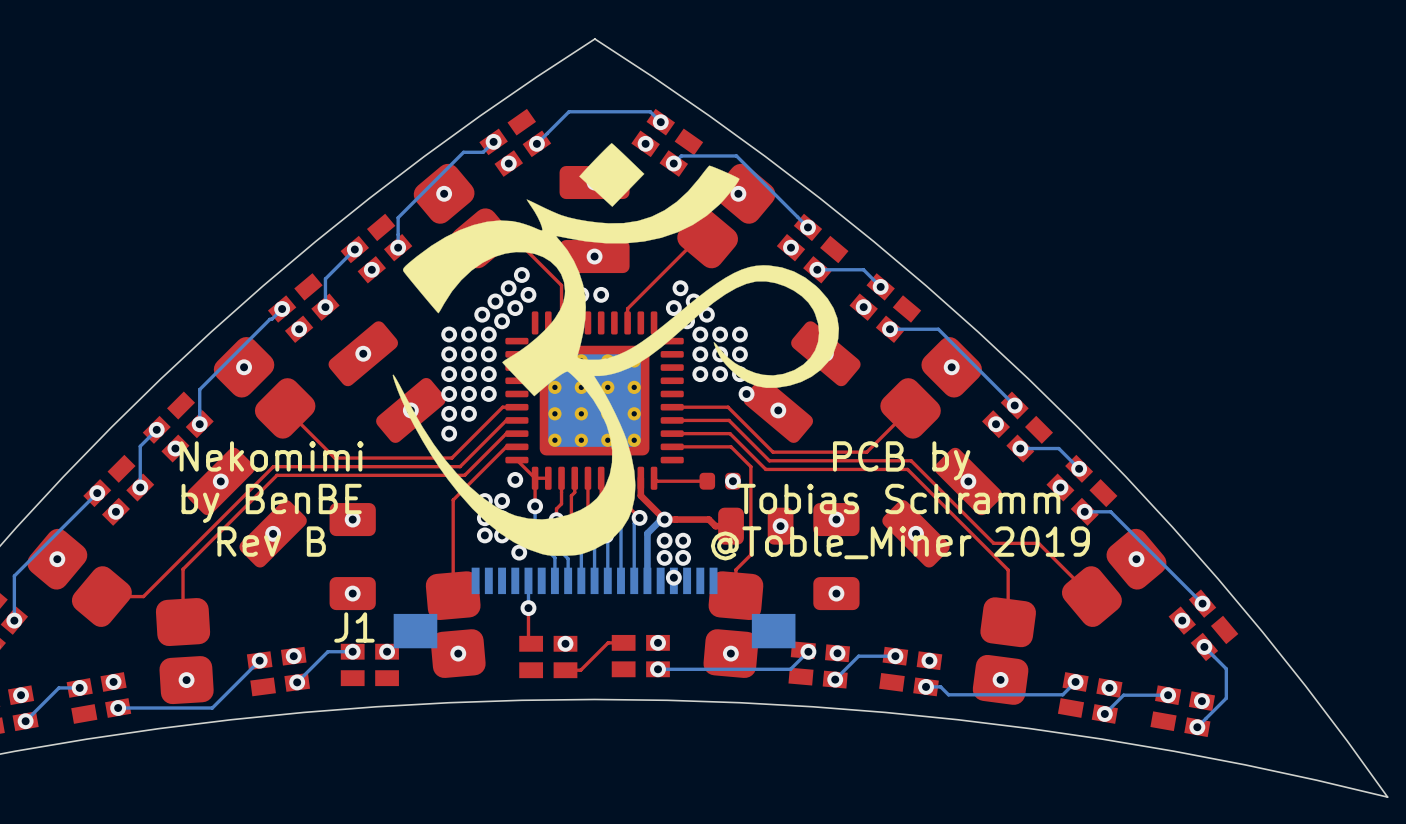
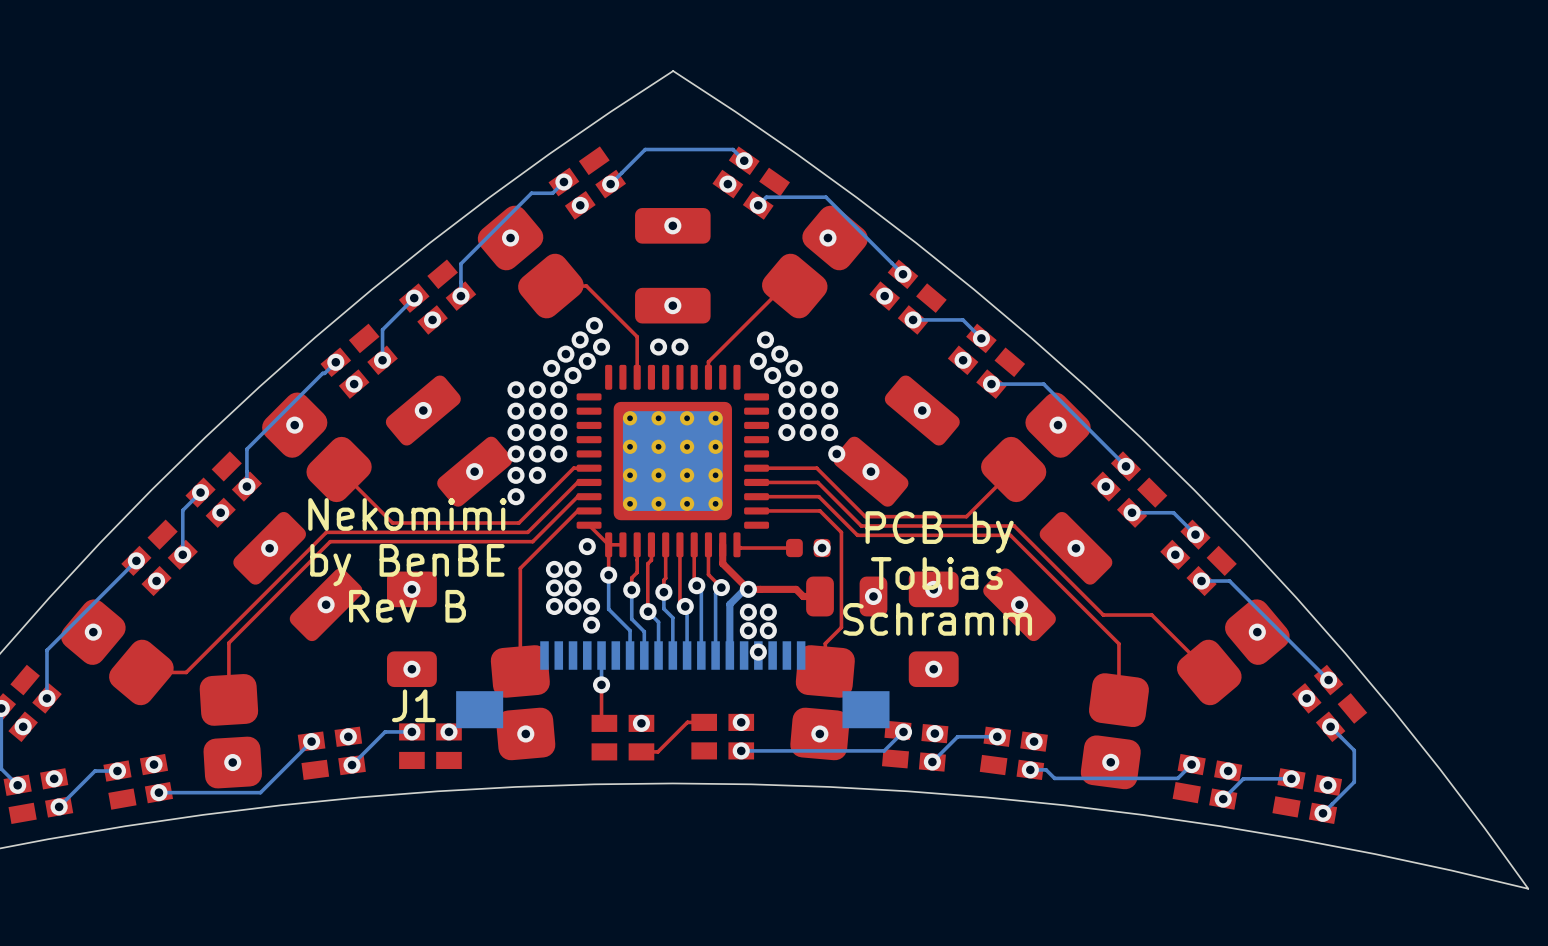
drawing: [392, 143, 840, 556] -> none
text position: Nekomimi (271, 456) -> Nekomimi (407, 514)
text position: PCB by (901, 460) -> PCB by (939, 532)
text: Tobias Schramm (898, 499) -> Schramm (937, 619)
text position: by BenBE (271, 503) -> by BenBE (407, 565)
text: none -> Tobias (936, 573)
text position: Rev B (271, 541) -> Rev B (407, 606)
text: @Toble_Miner 2019 (900, 543) -> none

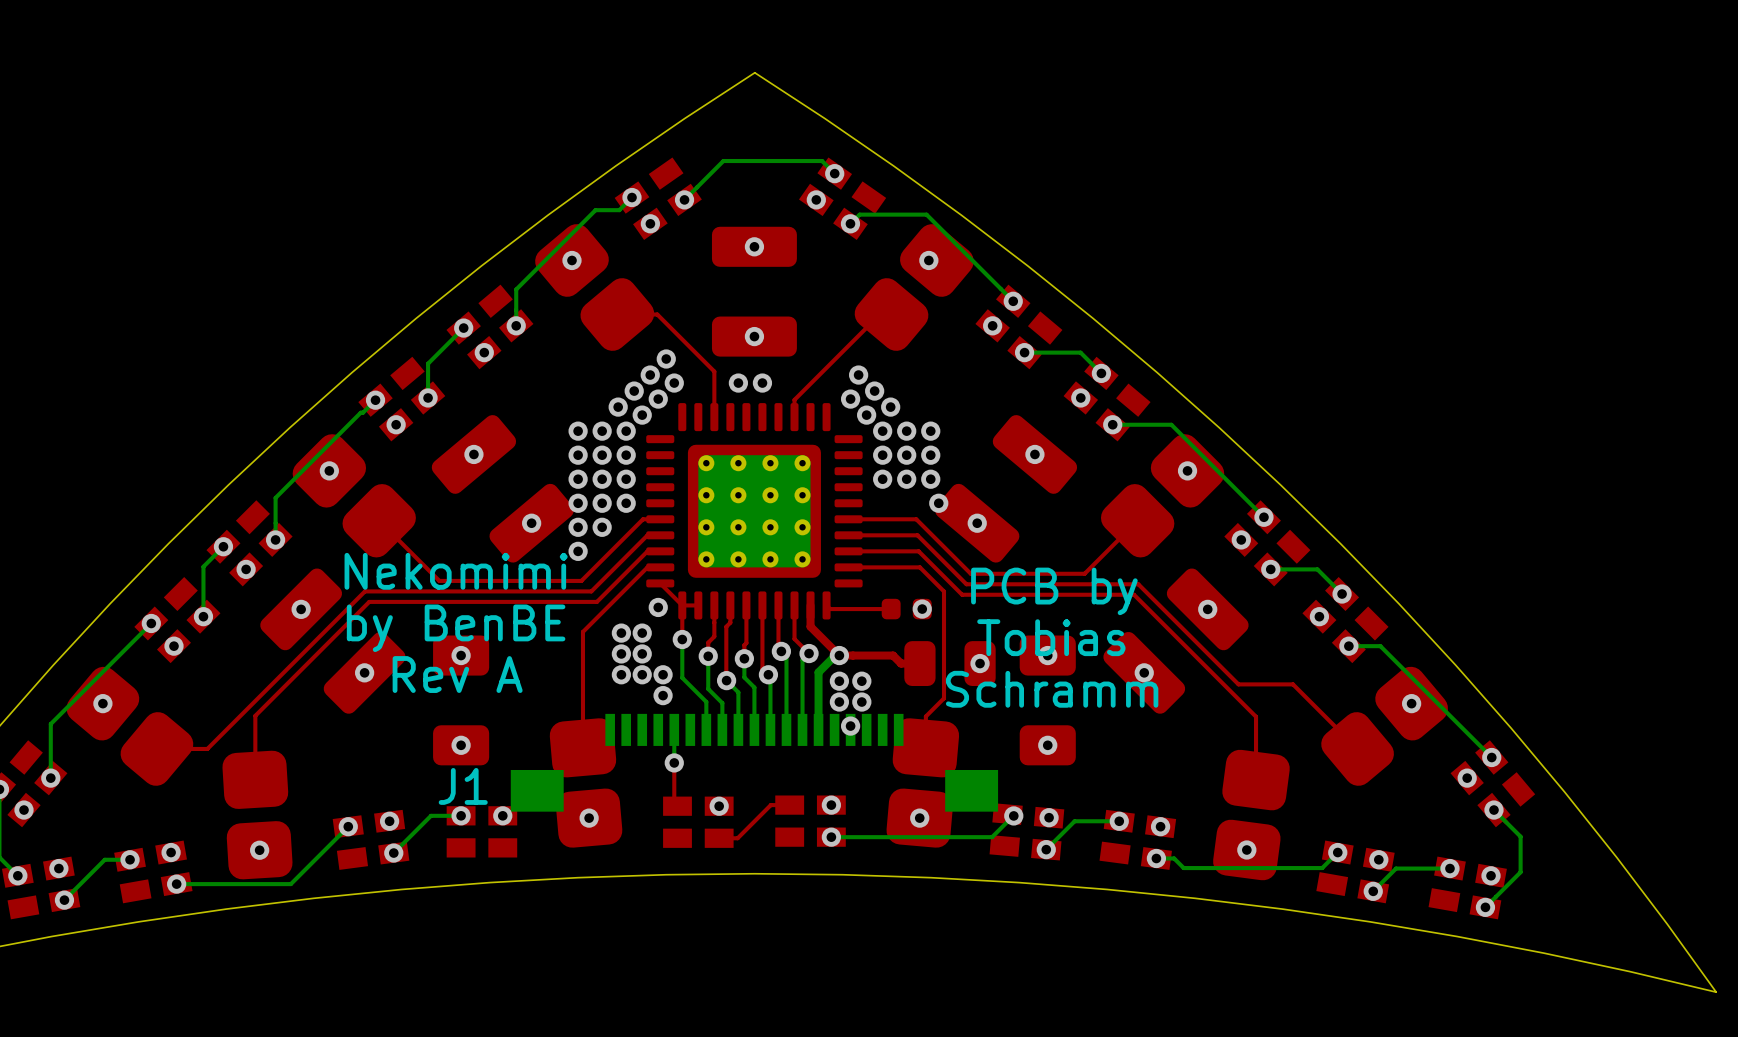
text: Rev B (407, 606) -> Rev A (457, 674)

